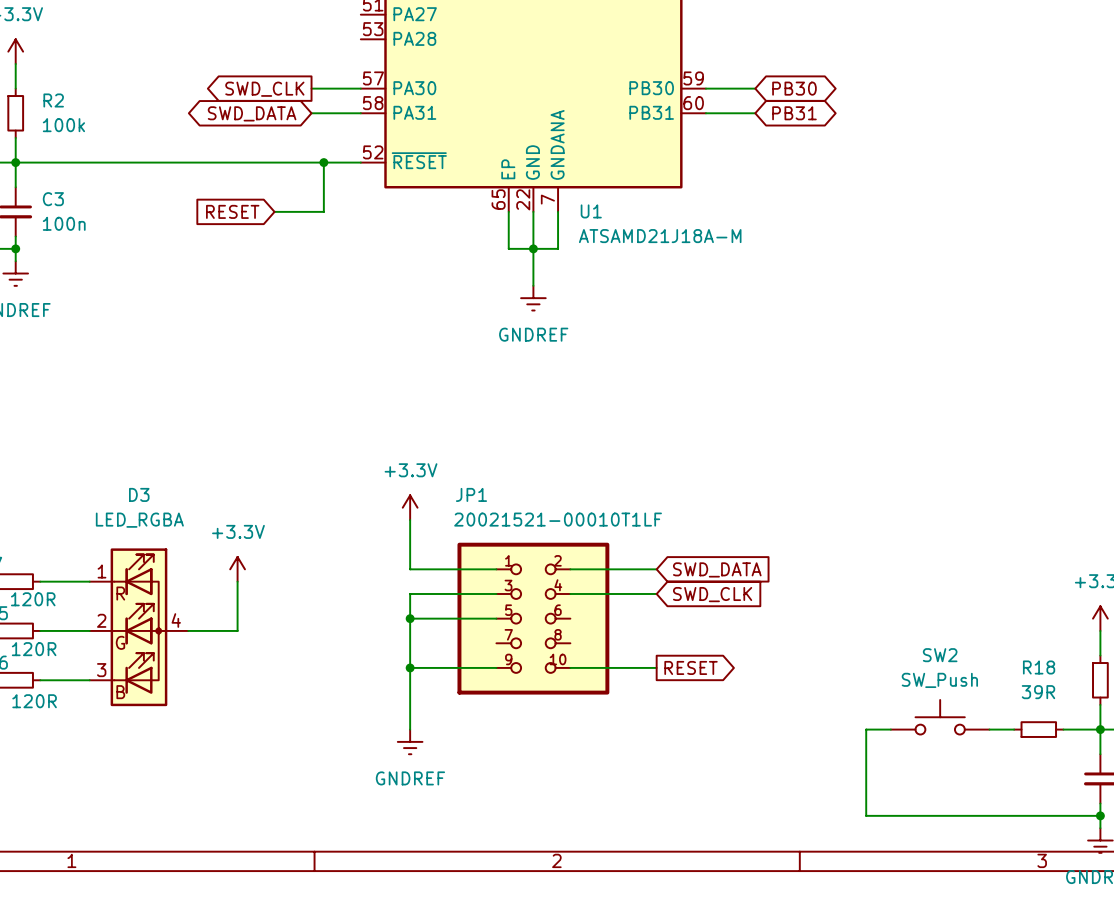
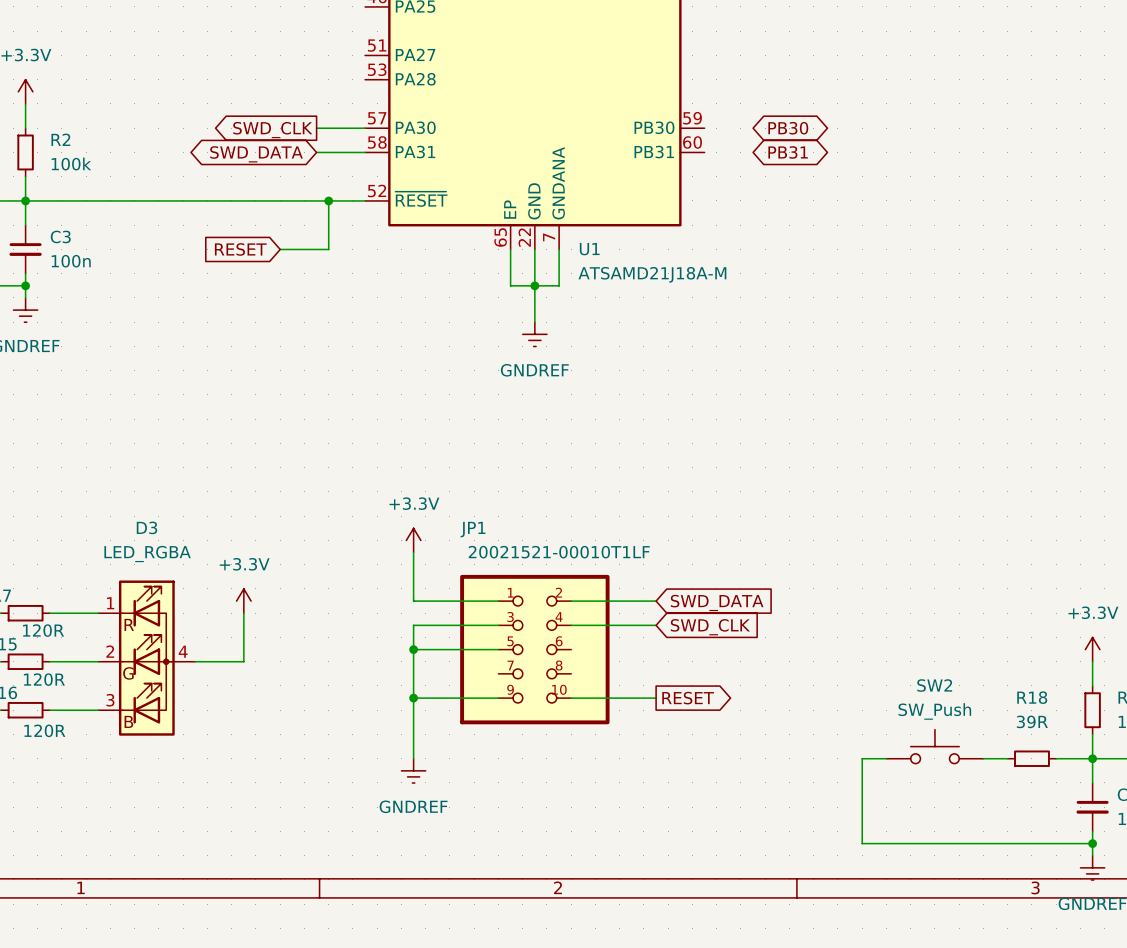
wire: (705, 88) (755, 88) -> none
wire: (705, 113) (755, 113) -> none

